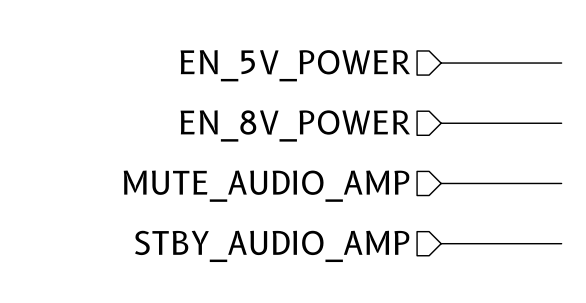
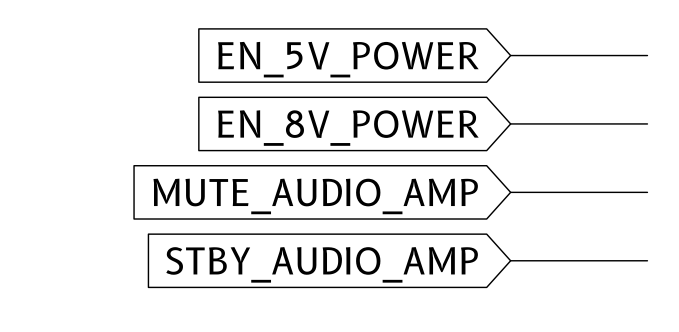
hierarchical label: EN_5V_POWER (295, 65) -> none
global label: none -> EN_5V_POWER (348, 59)
hierarchical label: EN_8V_POWER (295, 125) -> none
global label: none -> EN_8V_POWER (348, 128)
hierarchical label: MUTE_AUDIO_AMP (266, 186) -> none
global label: none -> MUTE_AUDIO_AMP (315, 196)
hierarchical label: STBY_AUDIO_AMP (272, 246) -> none
global label: none -> STBY_AUDIO_AMP (322, 264)

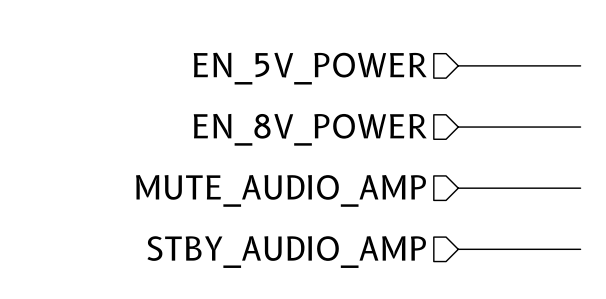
hierarchical label: none -> EN_5V_POWER (310, 68)
global label: EN_5V_POWER (348, 59) -> none
hierarchical label: none -> EN_8V_POWER (310, 129)
global label: EN_8V_POWER (348, 128) -> none
hierarchical label: none -> MUTE_AUDIO_AMP (280, 190)
global label: MUTE_AUDIO_AMP (315, 196) -> none
hierarchical label: none -> STBY_AUDIO_AMP (286, 252)
global label: STBY_AUDIO_AMP (322, 264) -> none

